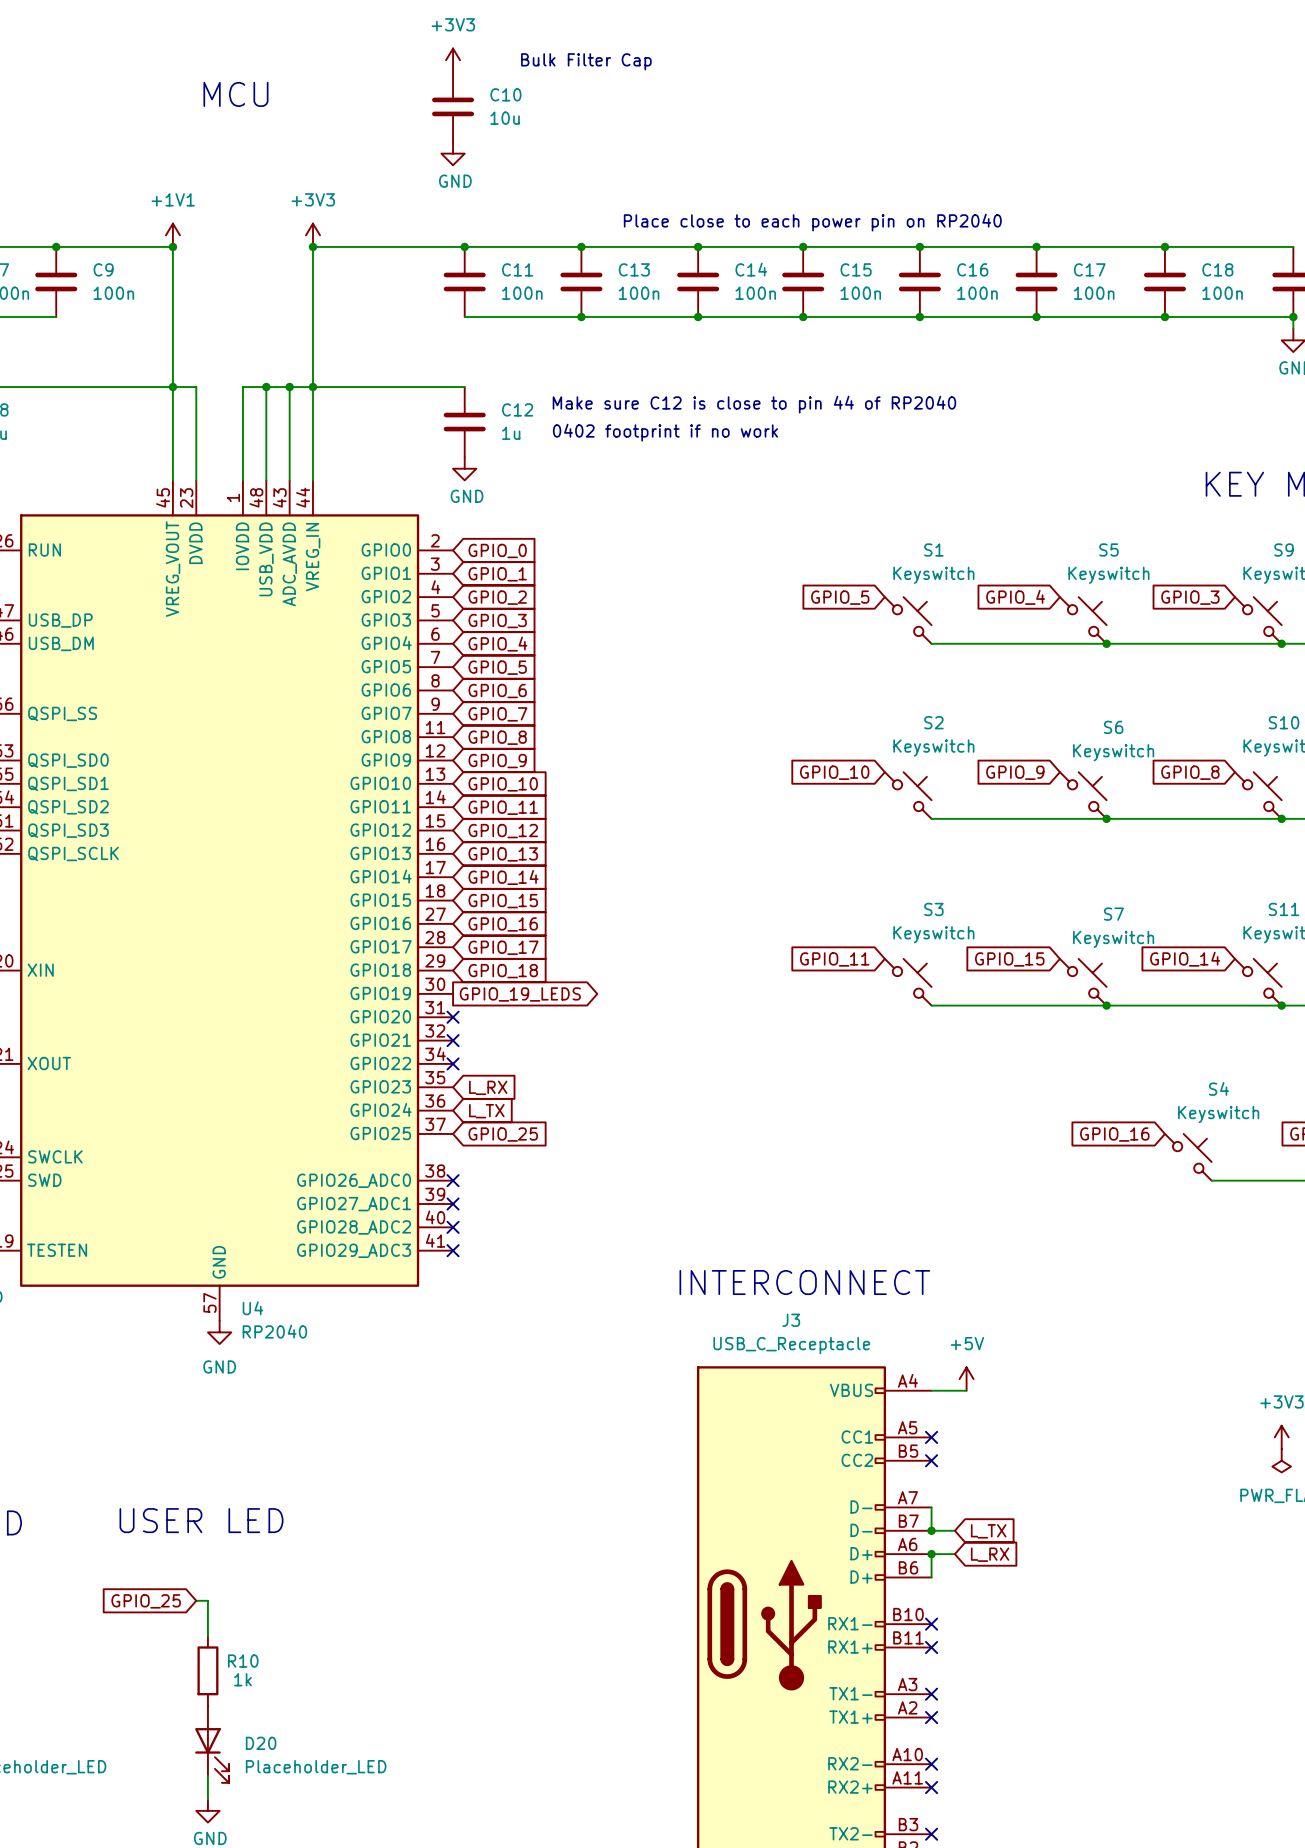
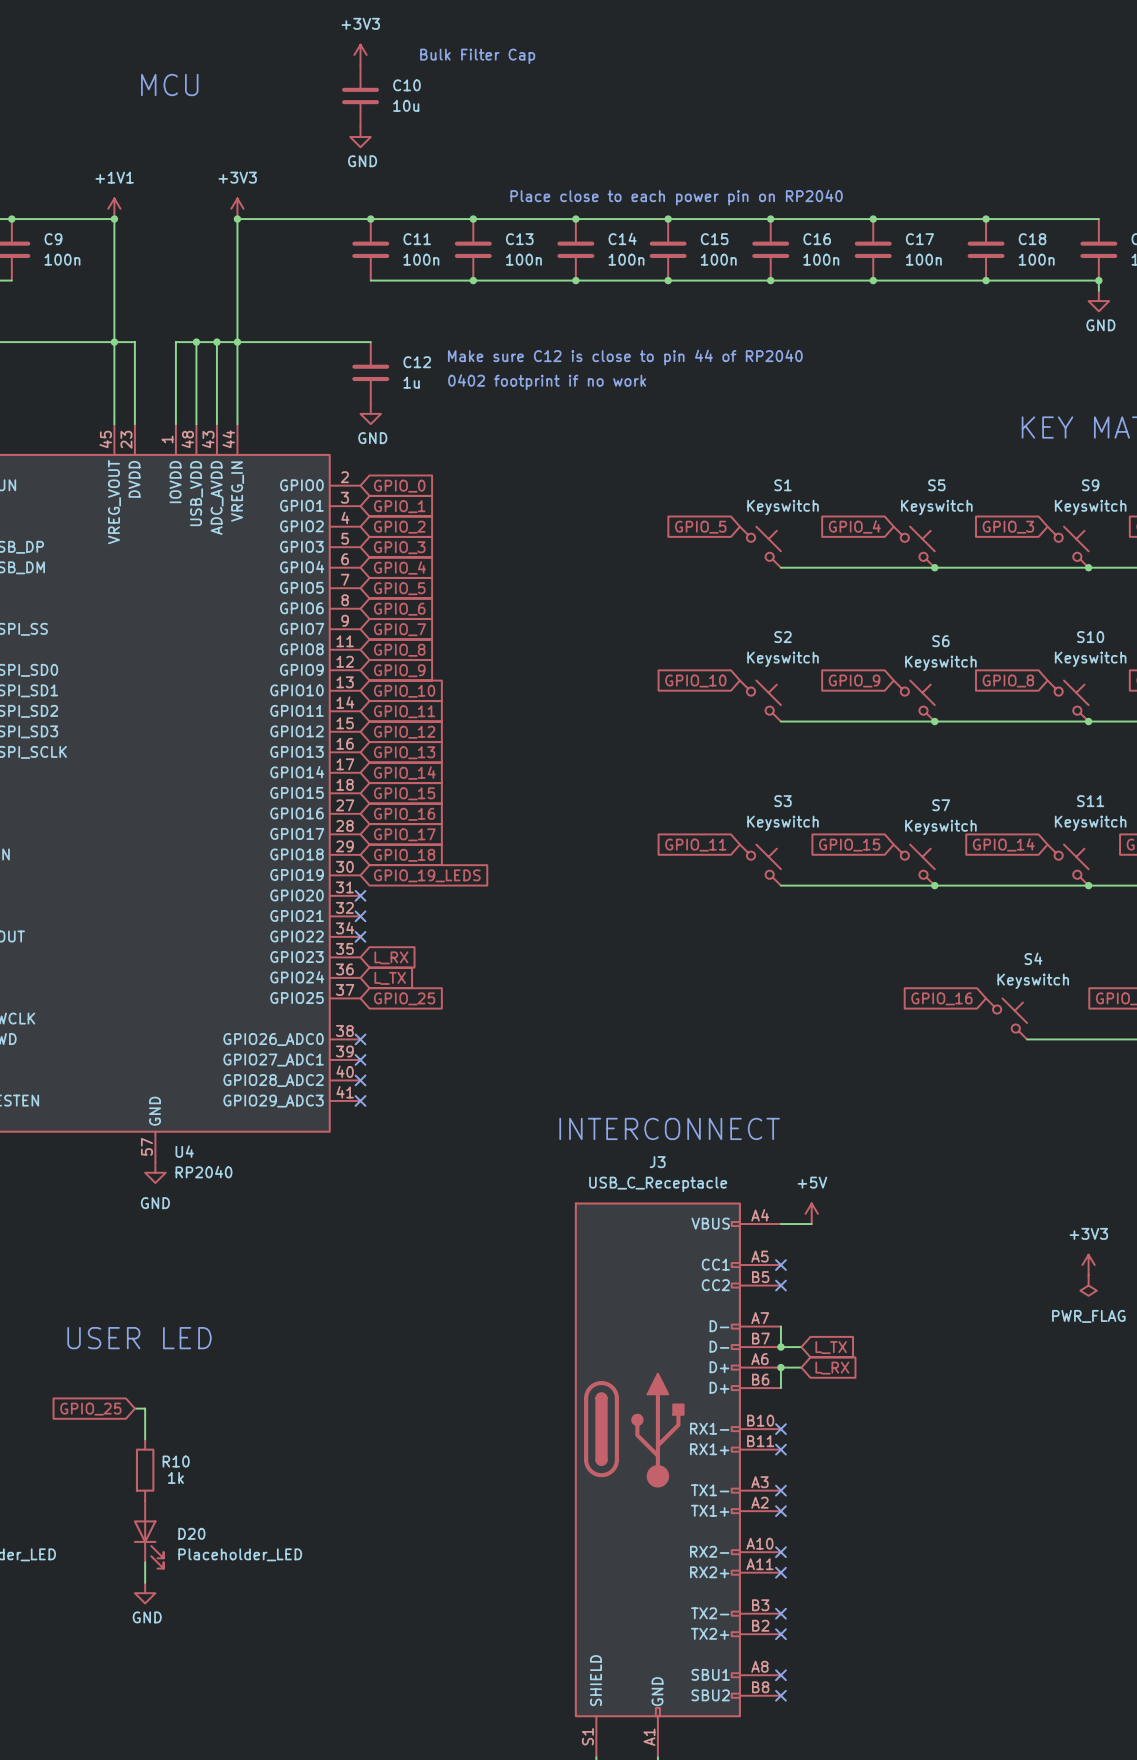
global label shape: output (520, 994) -> input (427, 875)

